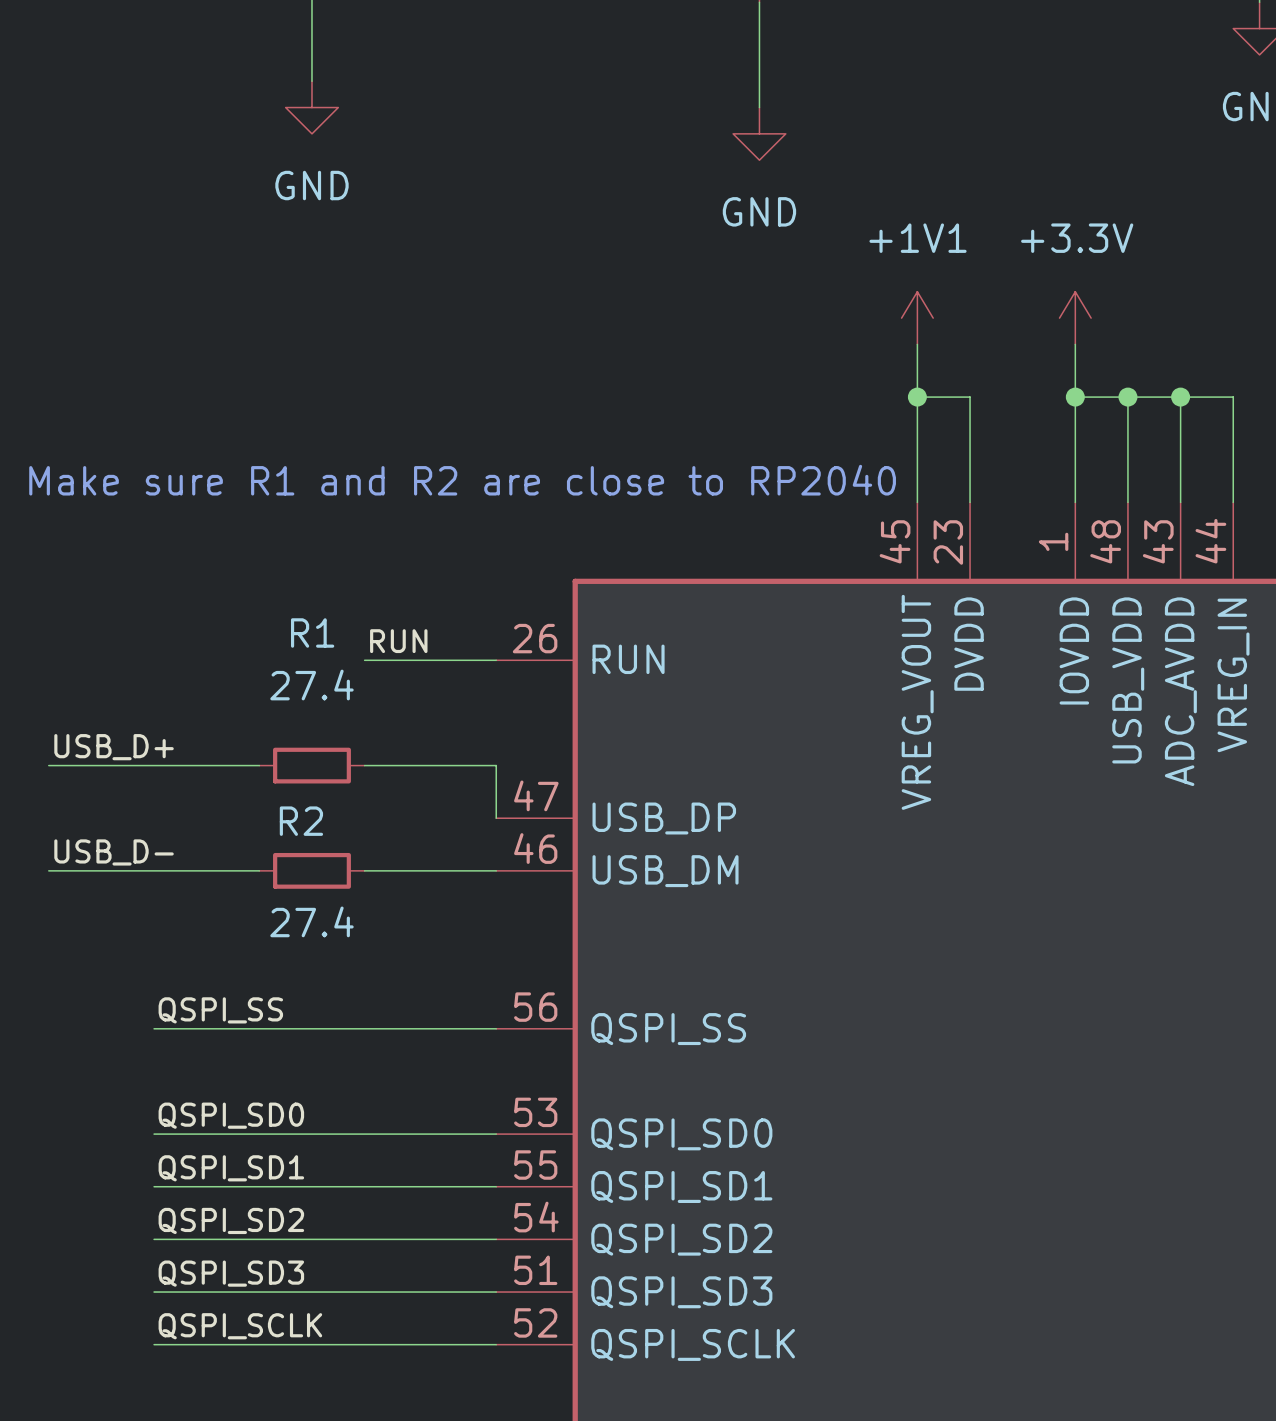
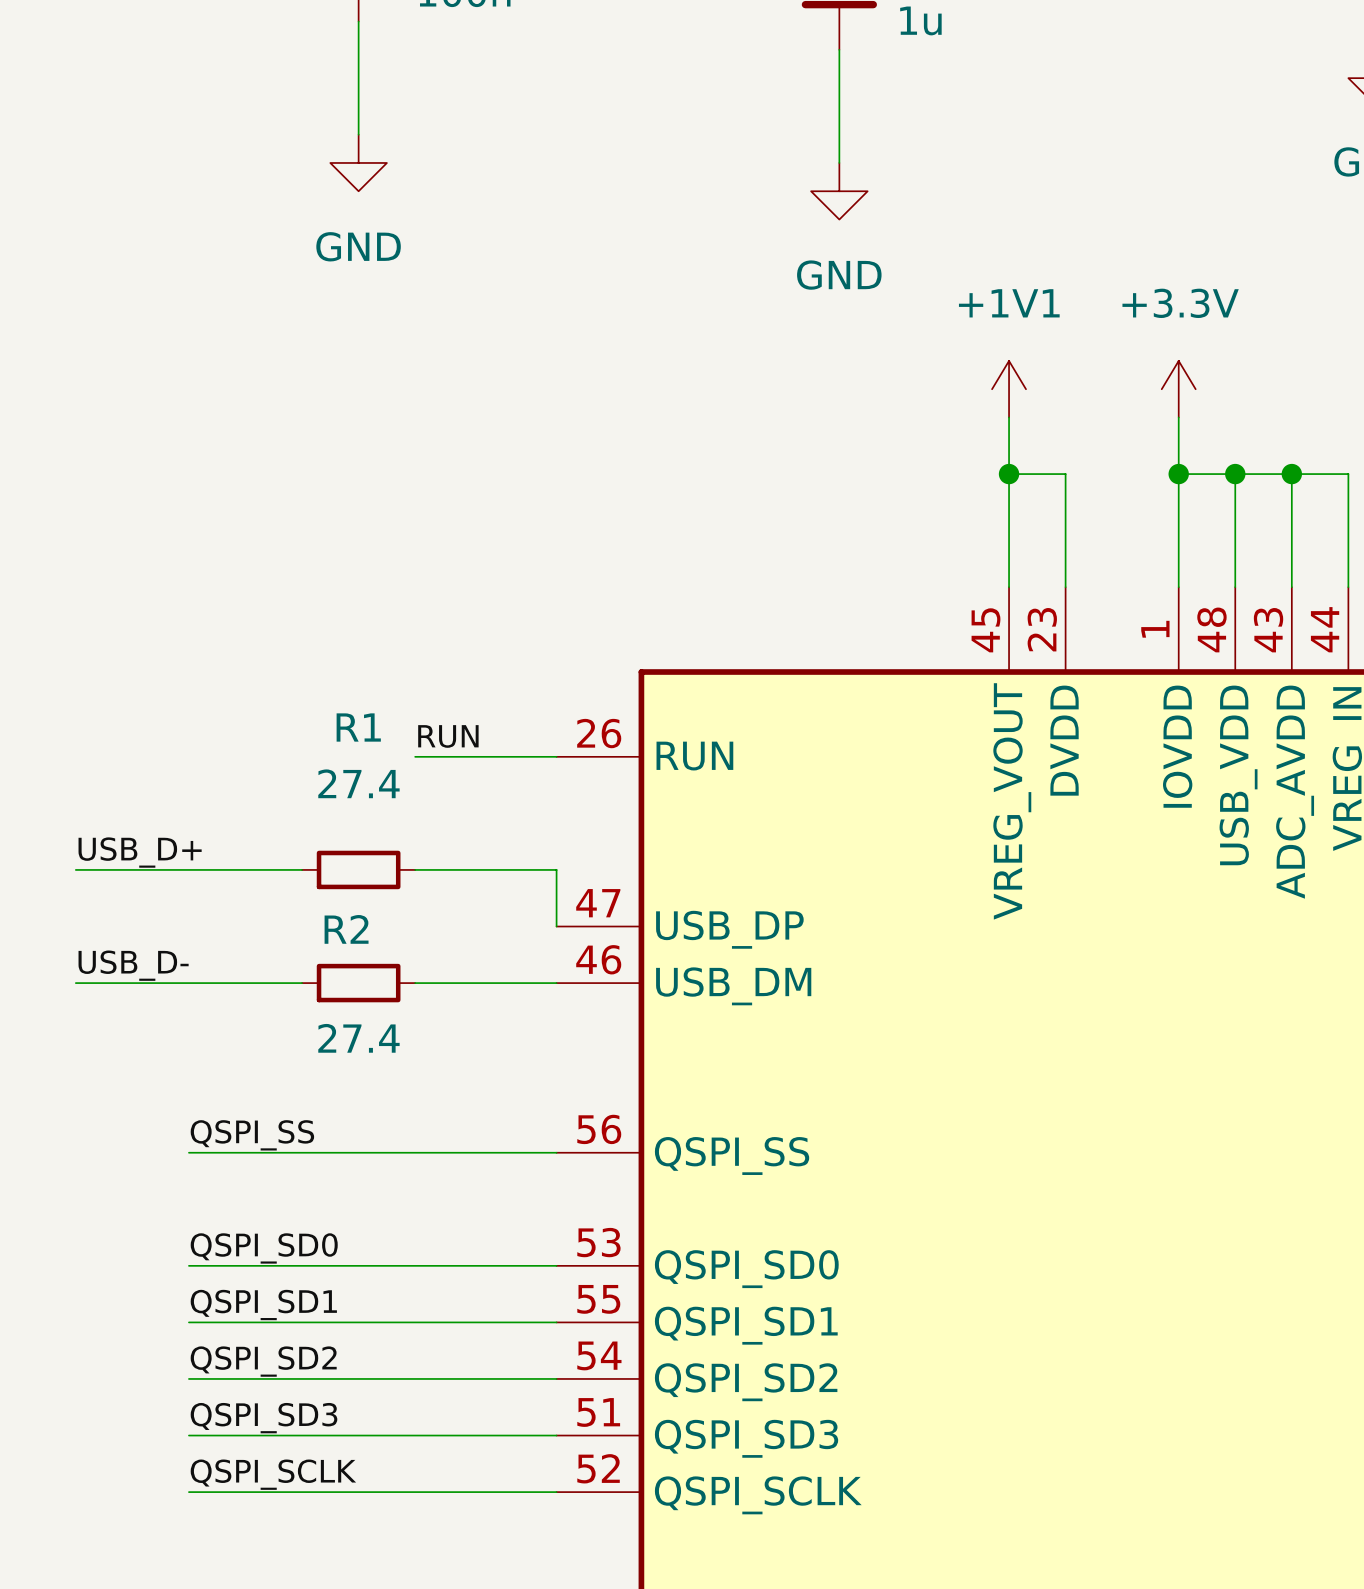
text: Make sure R1 and R2 are close to RP2040 (462, 480) -> none

